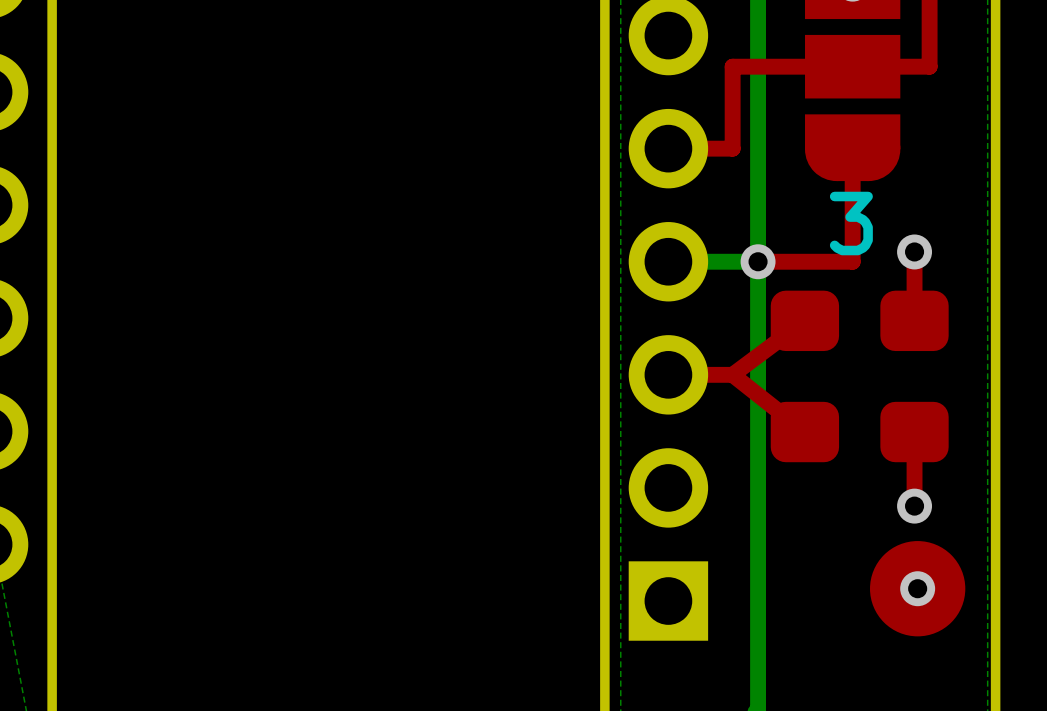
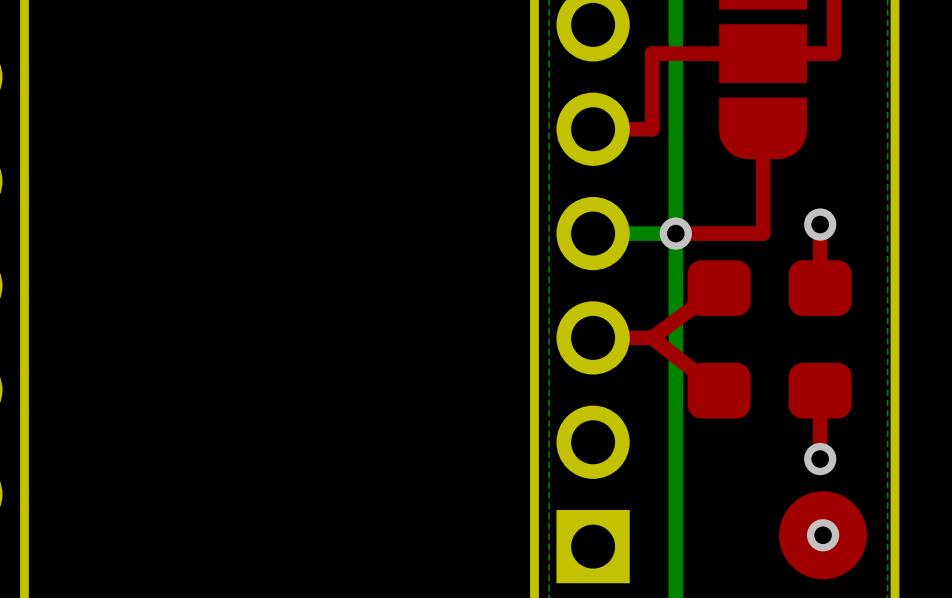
text: 3 (851, 223) -> none

